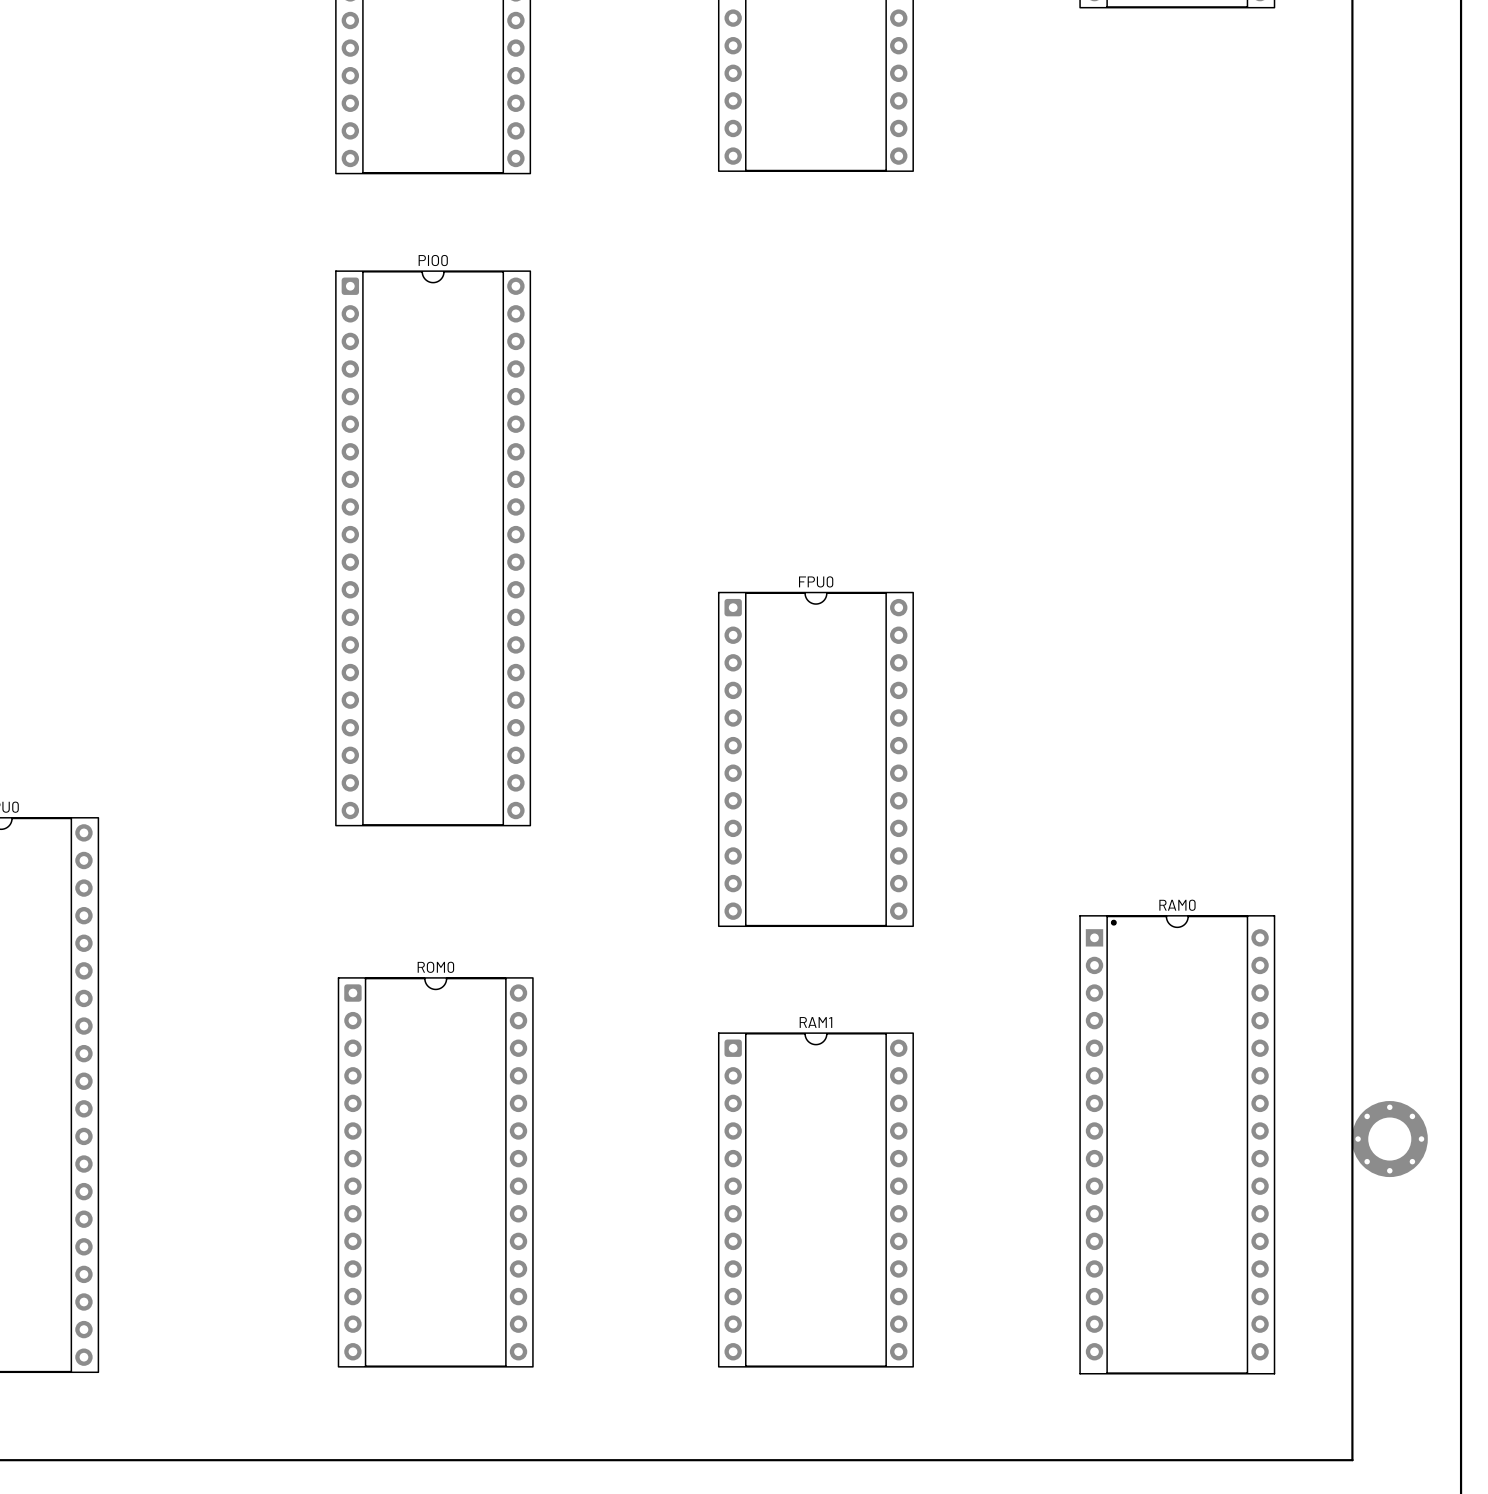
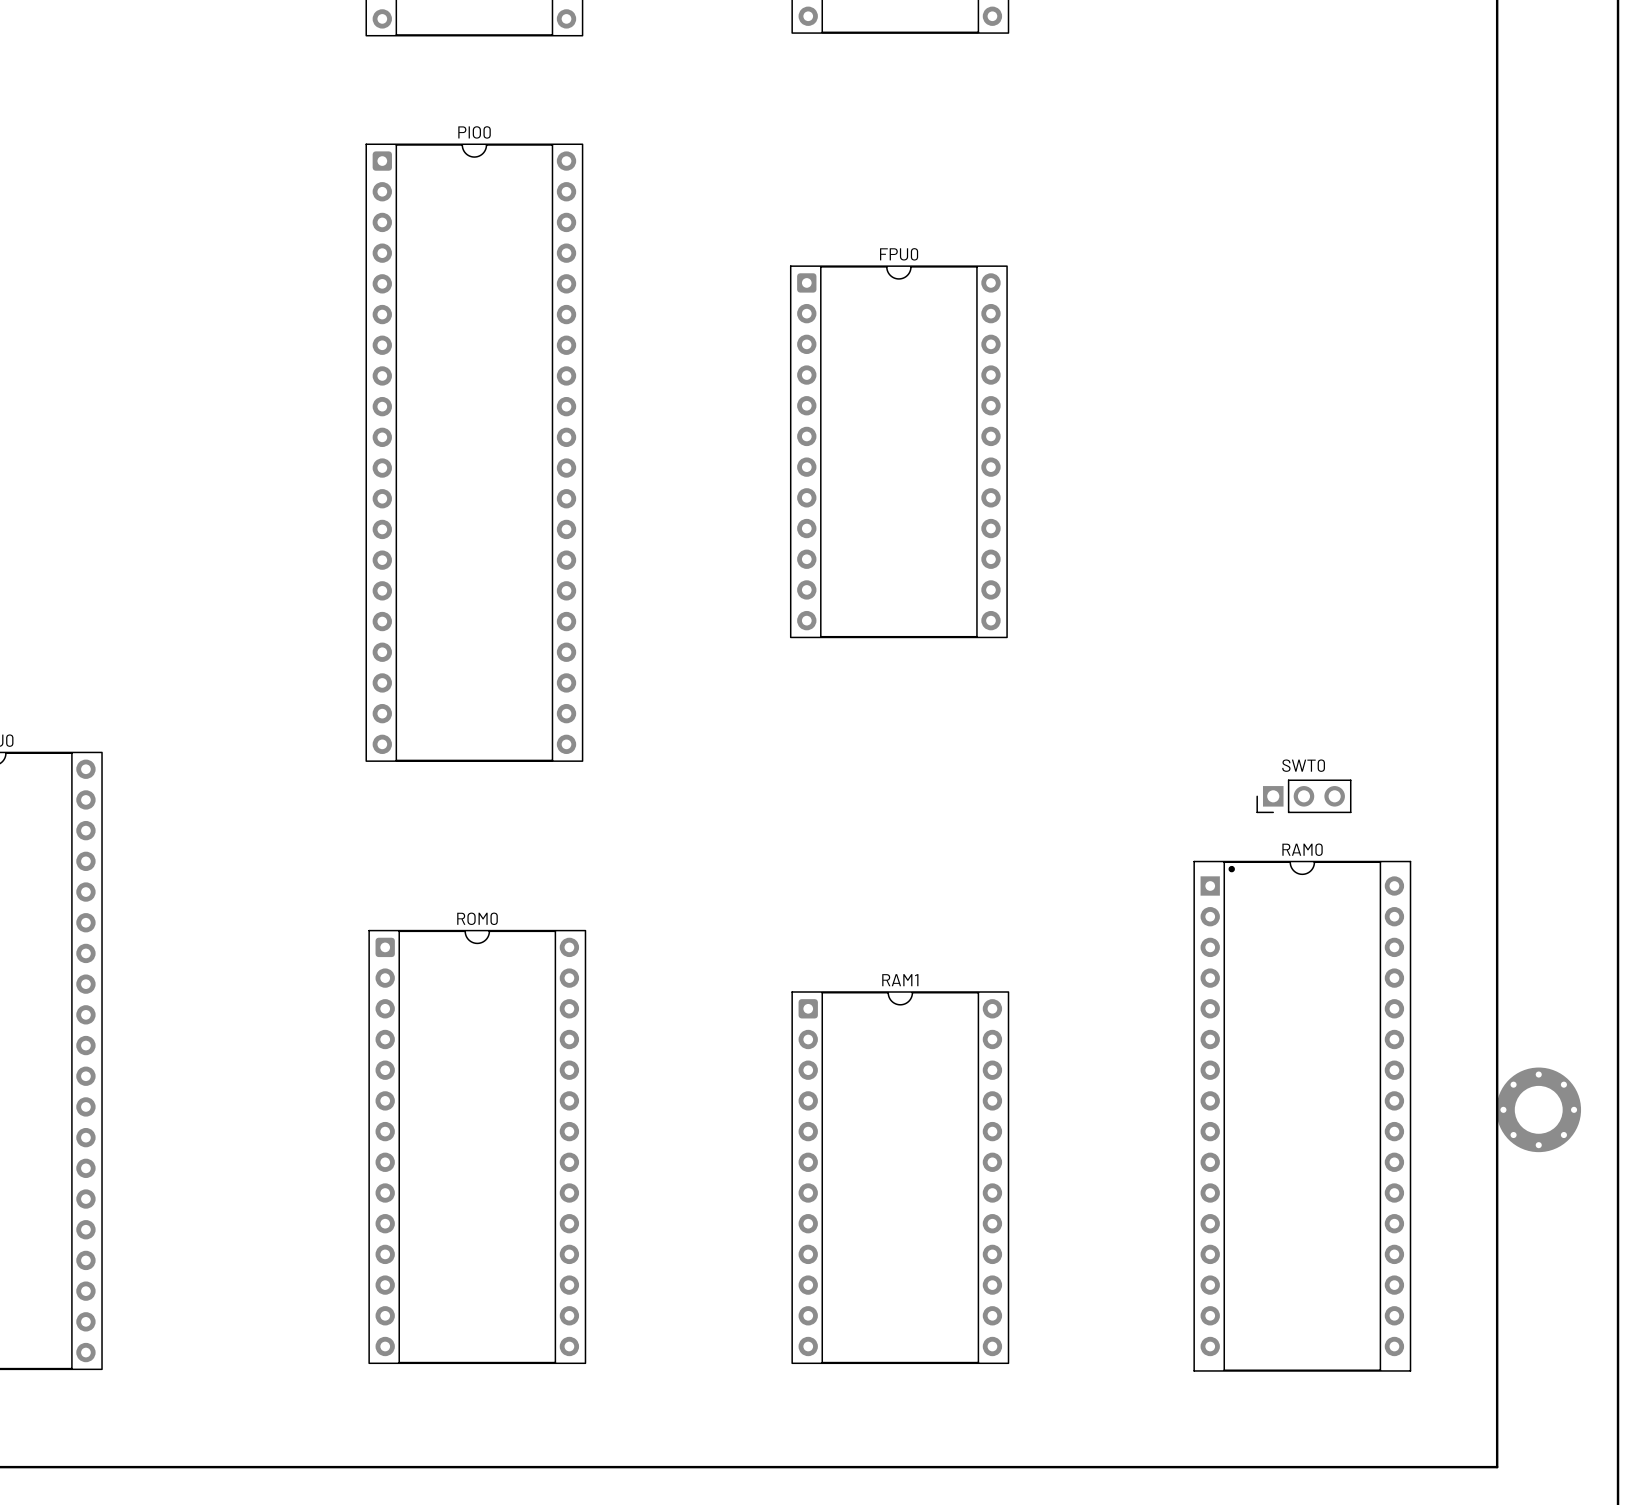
FPU0 position: (815, 759) -> (898, 451)
SWT0: none -> (1303, 796)

